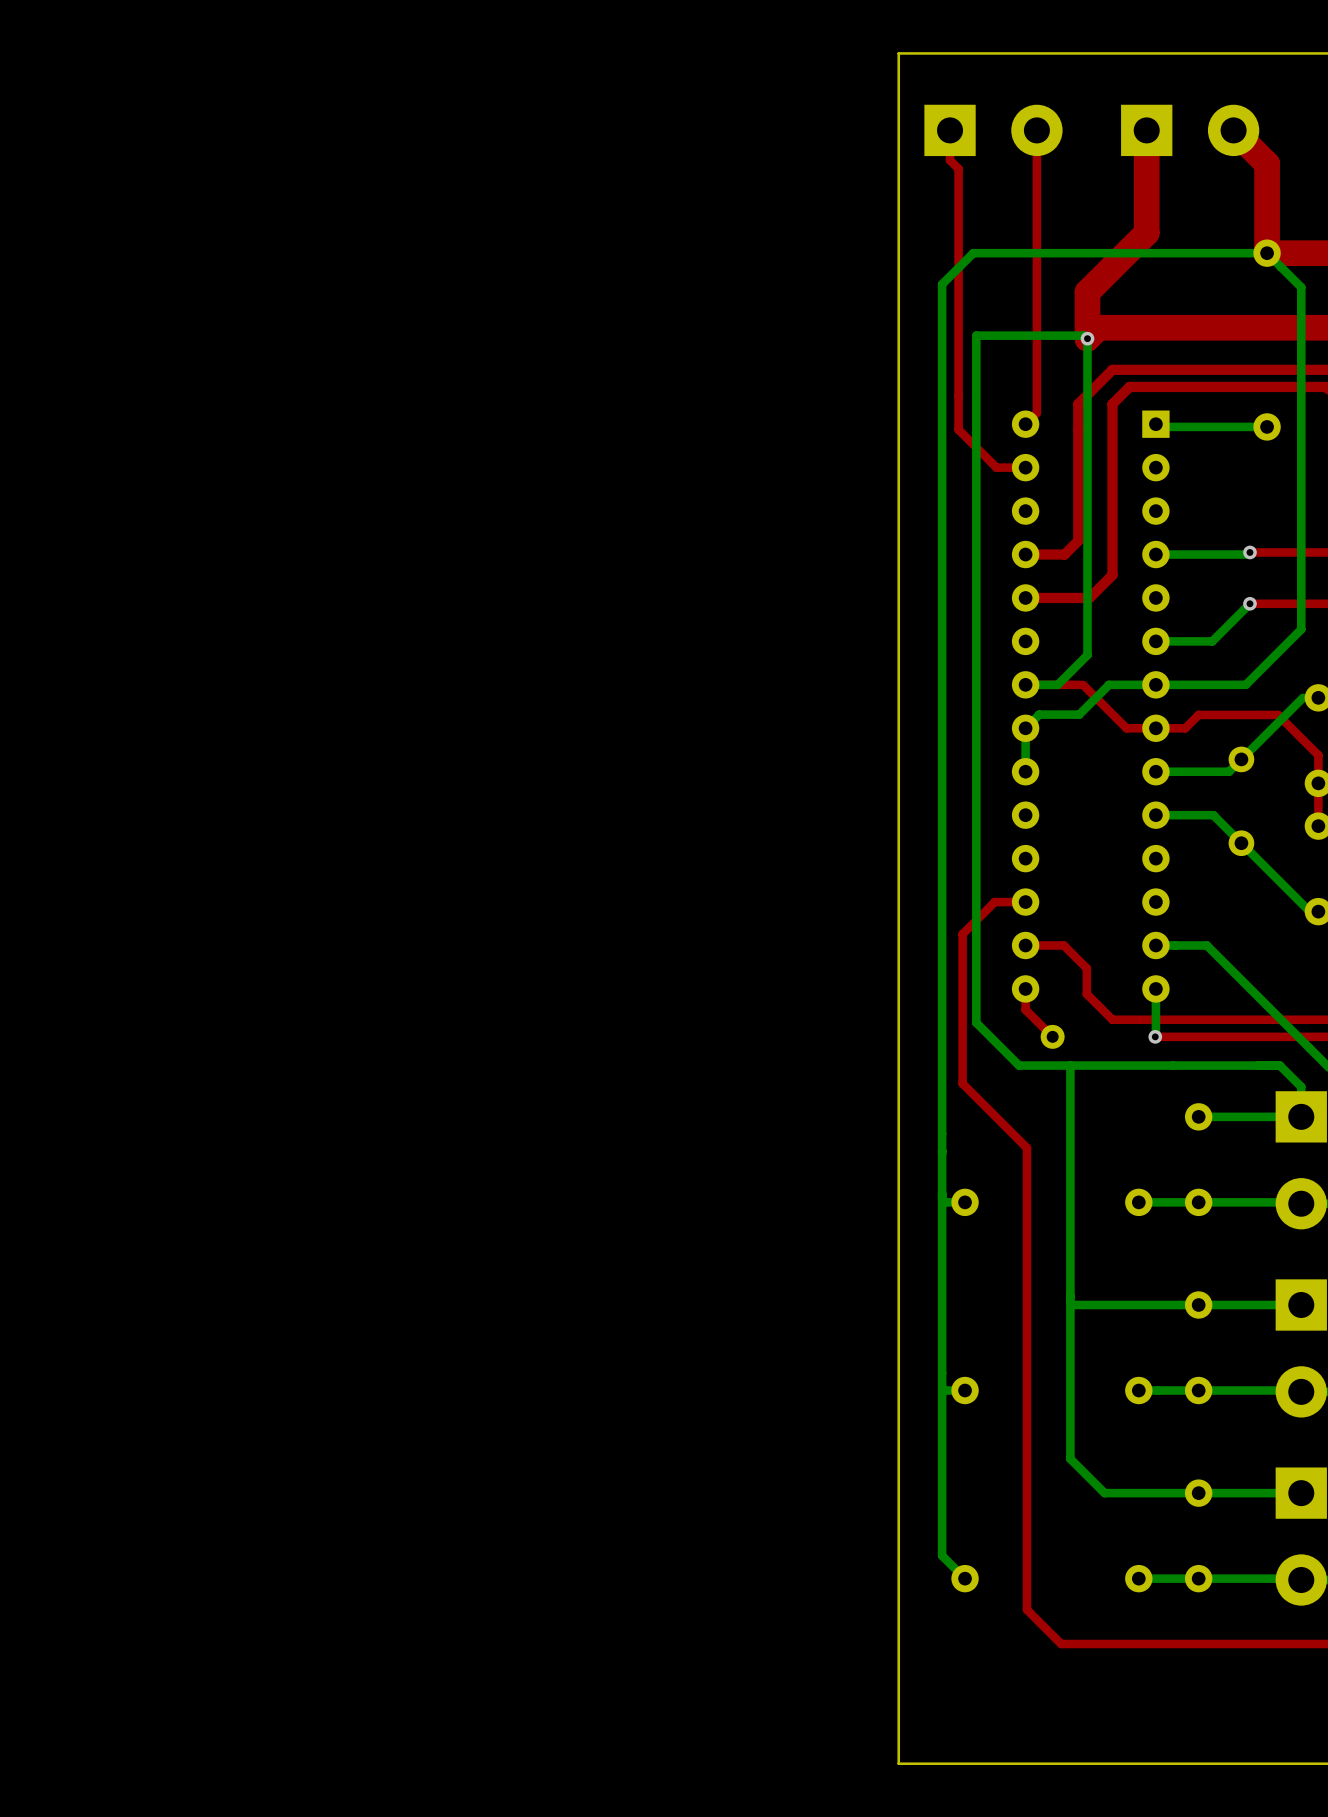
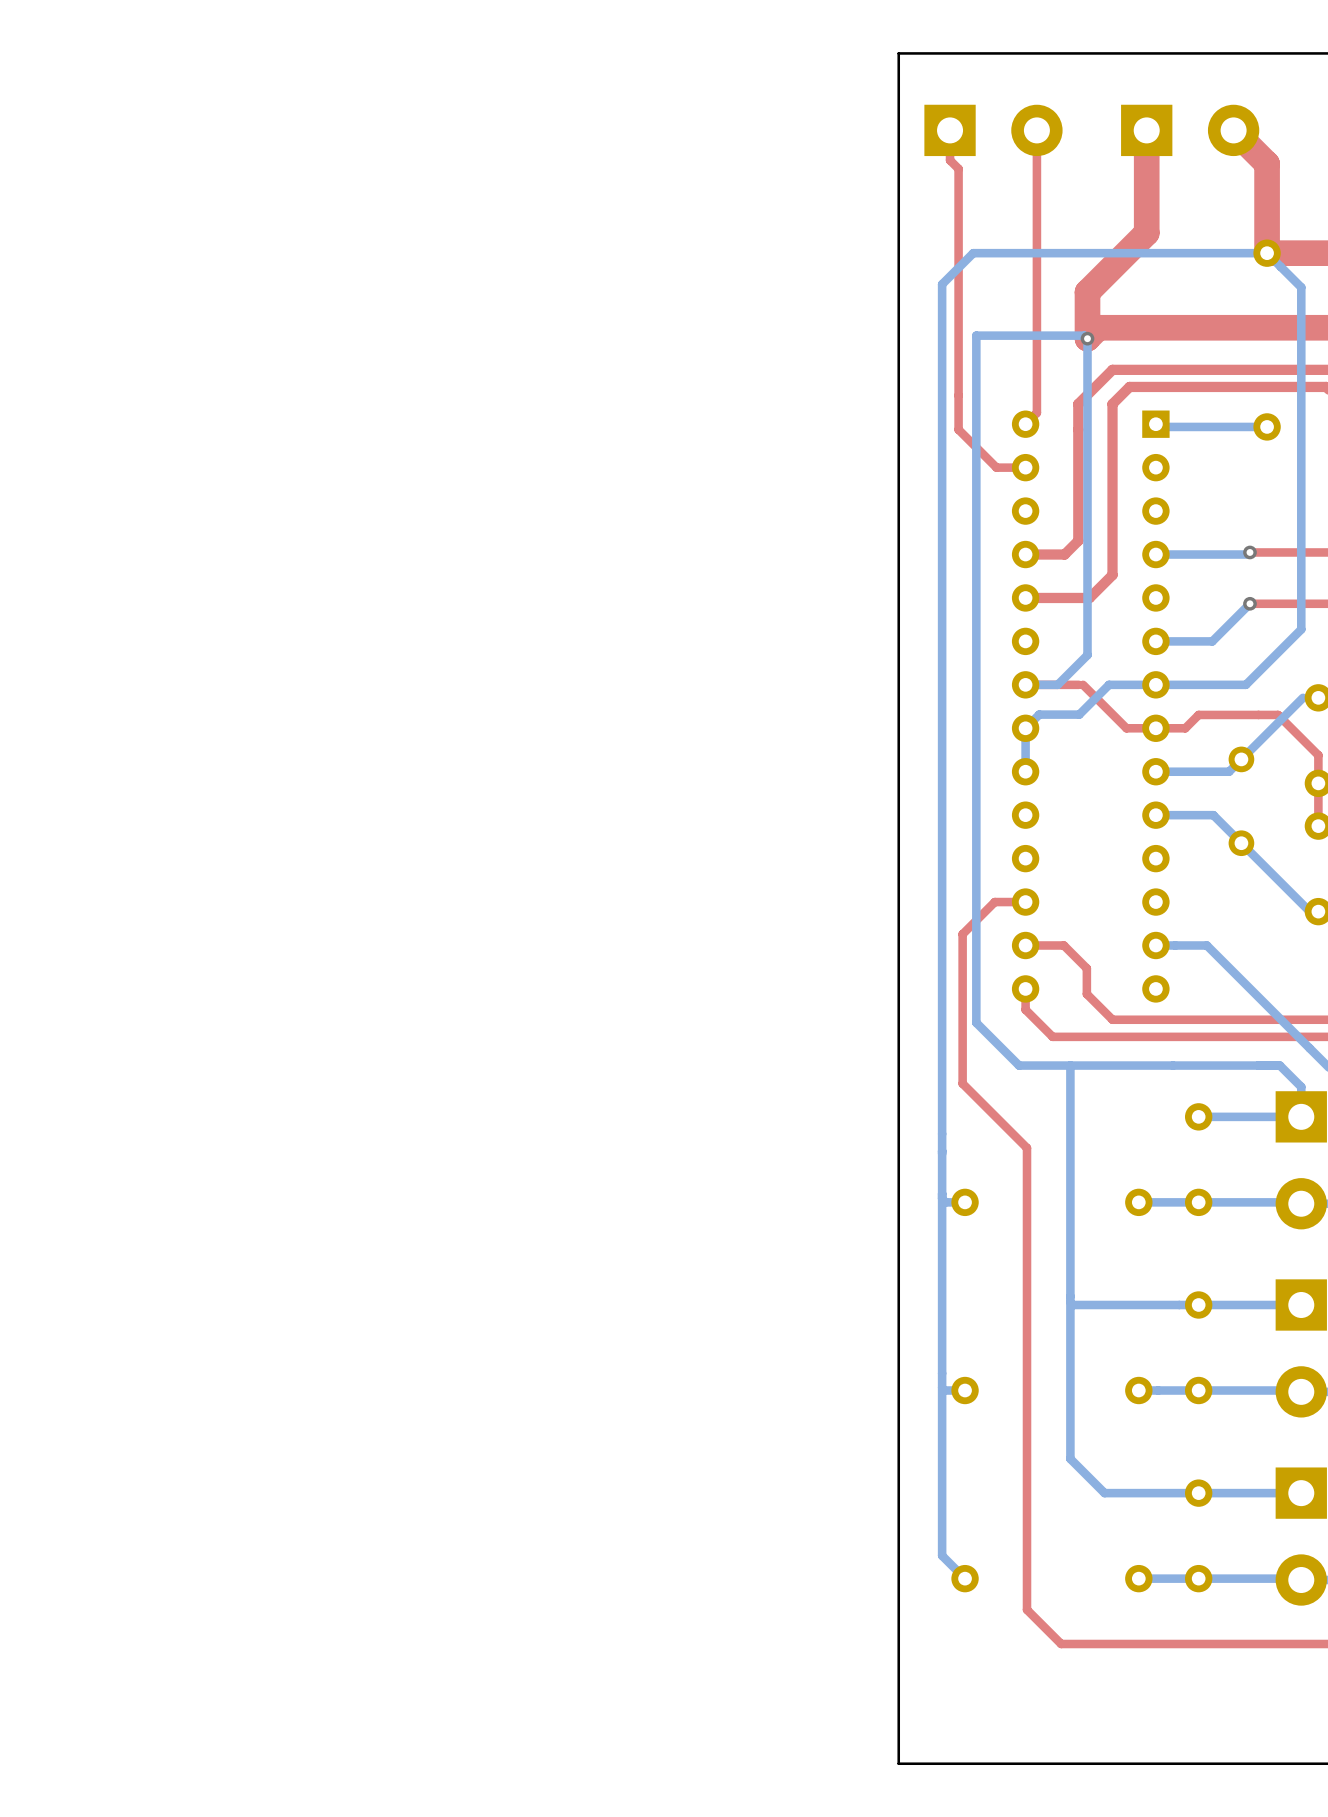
bottom track: (1155, 988) (1155, 1036) -> none
part: (1052, 1036) -> none
top track: none -> (1155, 1036) (1052, 1036)
via: (1155, 1036) -> none

